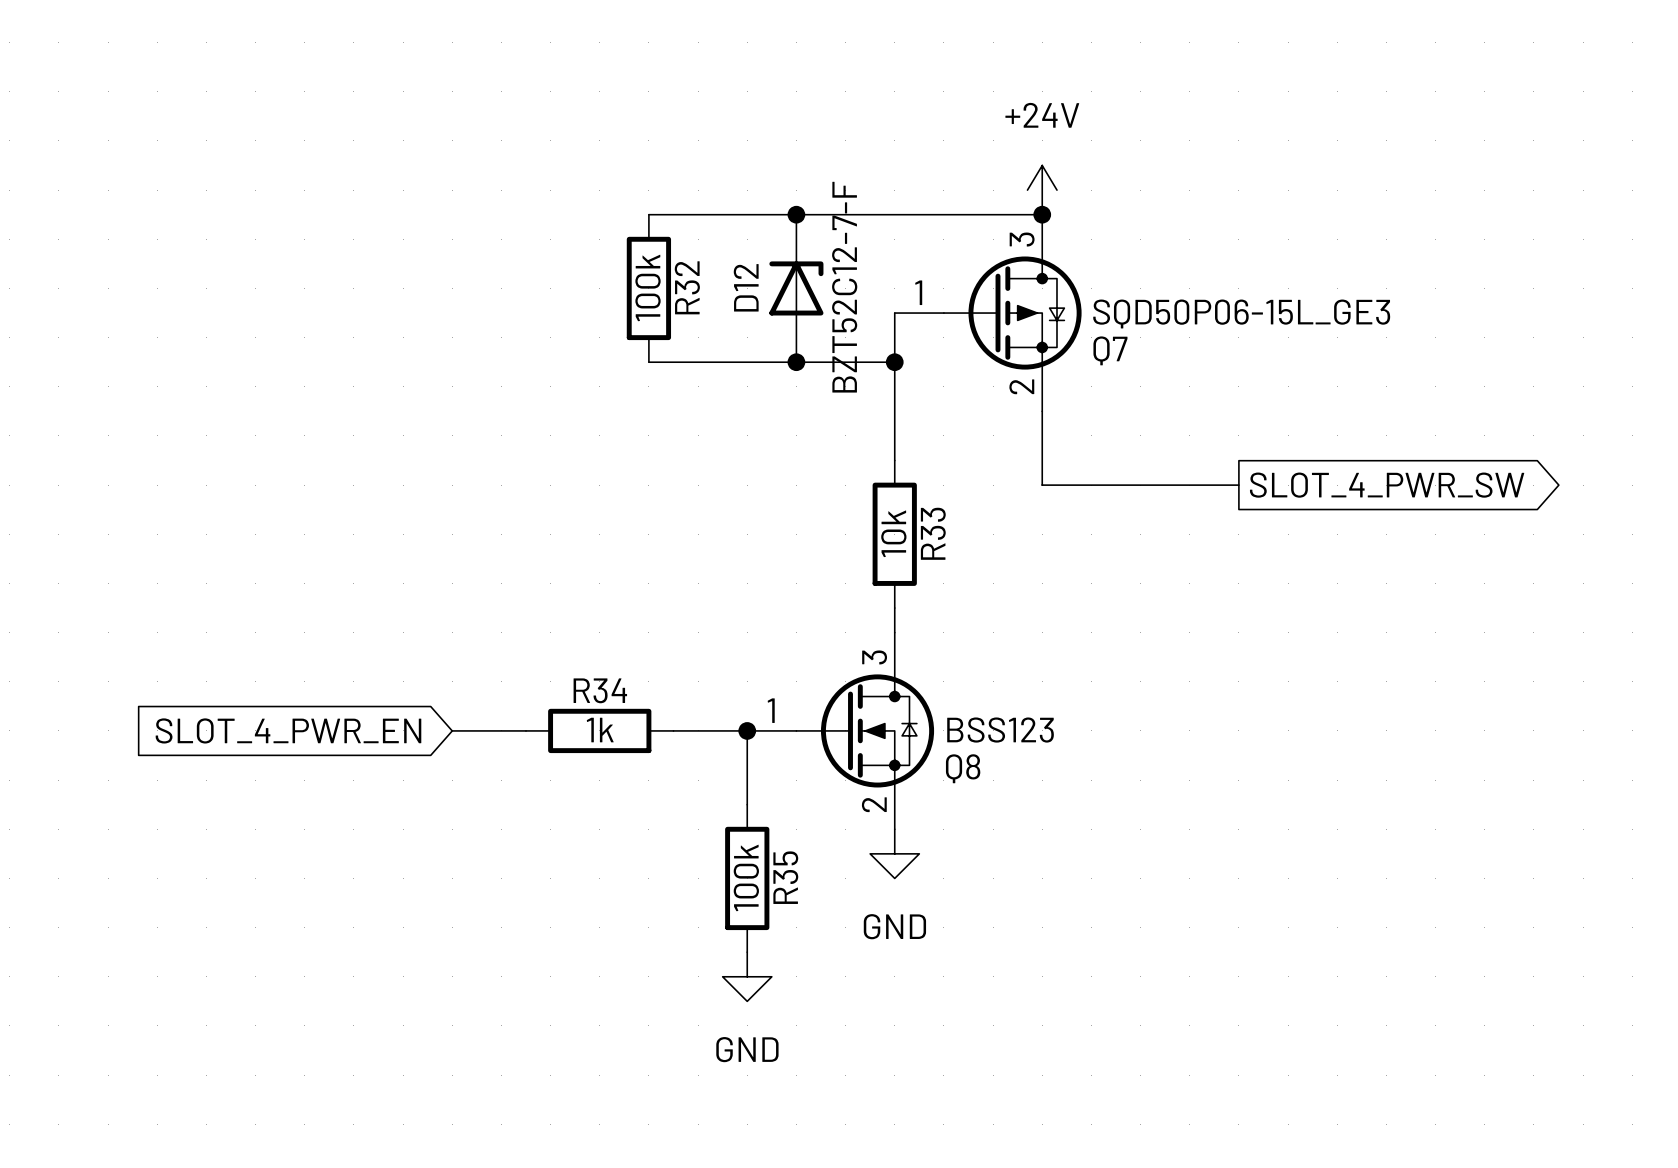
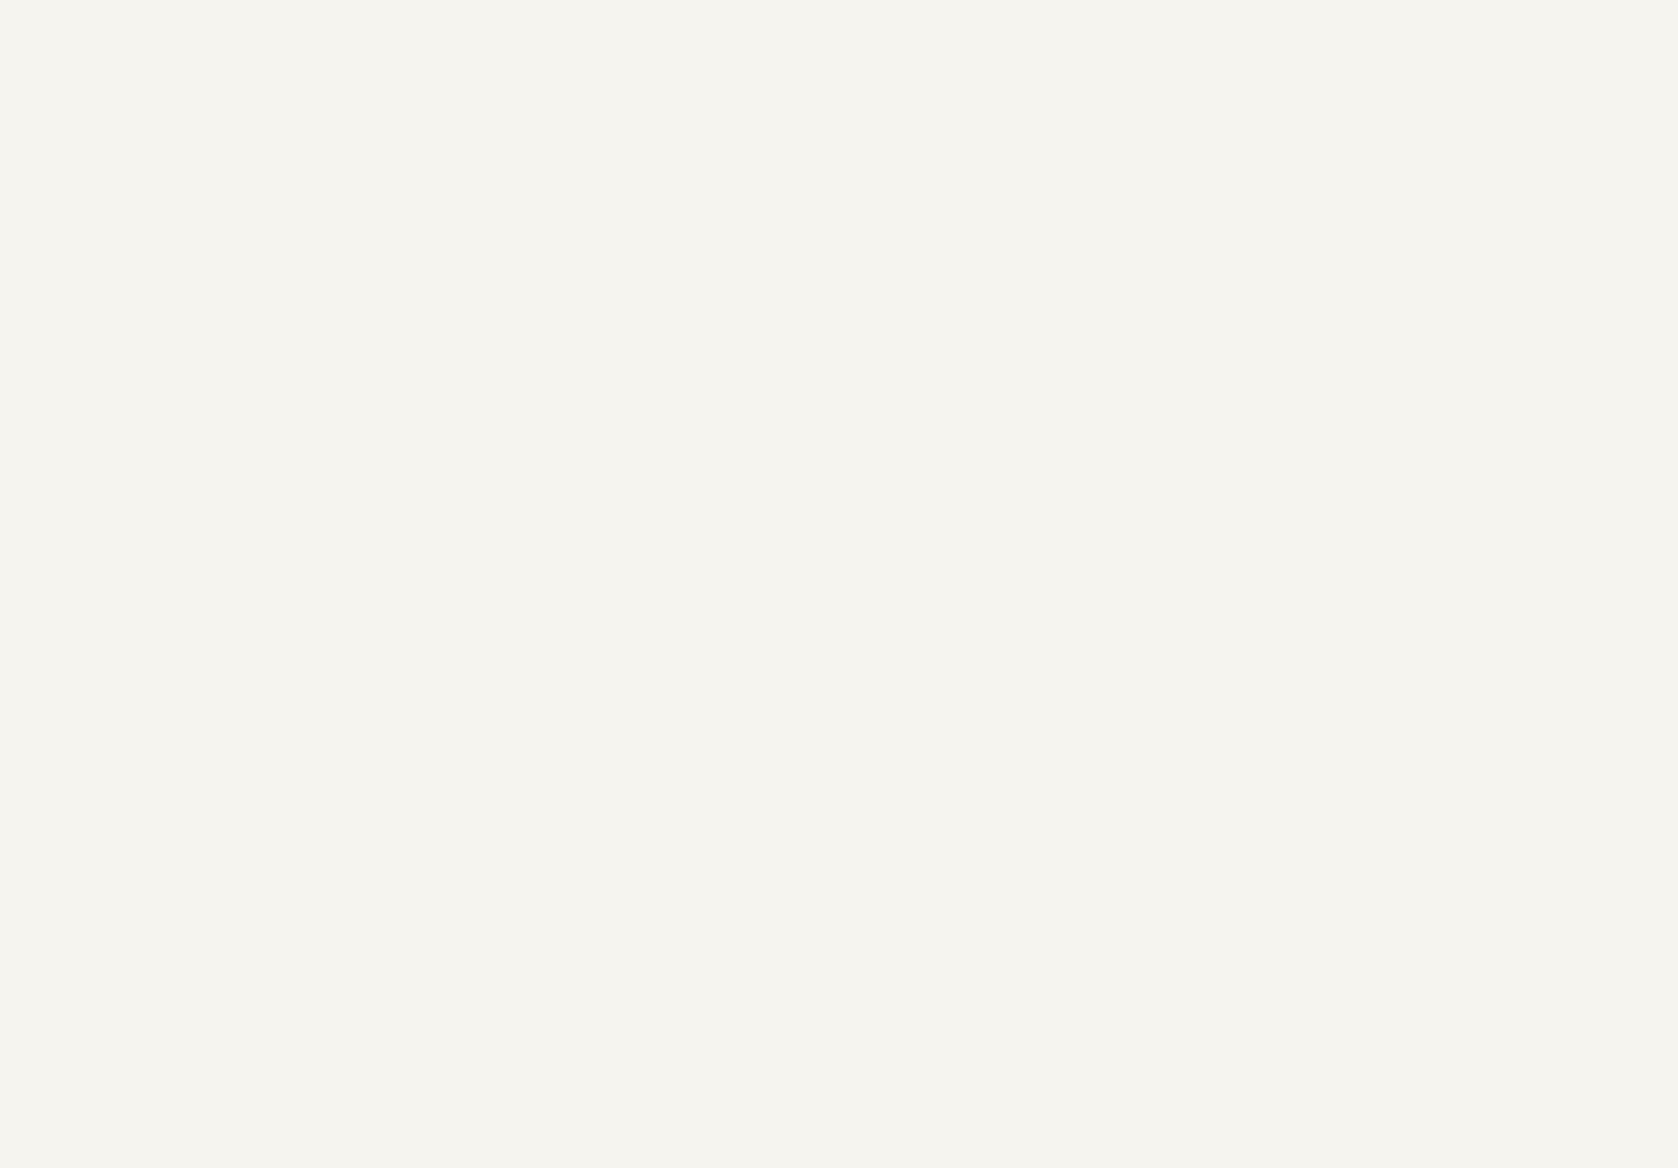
power symbol: +24V (1042, 190) -> none
wire: (648, 214) (1042, 214) -> none
junction: (796, 214) -> none
junction: (1042, 214) -> none
R32: 100k (648, 288) -> none
D12: BZT52C12-7-F (796, 288) -> none
wire: (894, 313) (894, 460) -> none
Q7: SQD50P06-15L_GE3 (988, 313) -> none
wire: (648, 362) (894, 362) -> none
junction: (796, 362) -> none
junction: (894, 362) -> none
wire: (1042, 411) (1042, 485) (1238, 485) -> none
global label: SLOT_4_PWR_SW (1387, 485) -> none
R33: 10k (894, 534) -> none
wire: (894, 608) (894, 632) -> none
global label: SLOT_4_PWR_EN (288, 730) -> none
wire: (452, 730) (525, 730) -> none
R34: 1k (599, 730) -> none
wire: (673, 730) (747, 730) (747, 804) -> none
junction: (747, 730) -> none
Q8: BSS123 (840, 730) -> none
power symbol: GND (894, 853) -> none
R35: 100k (747, 878) -> none
power symbol: GND (747, 976) -> none

